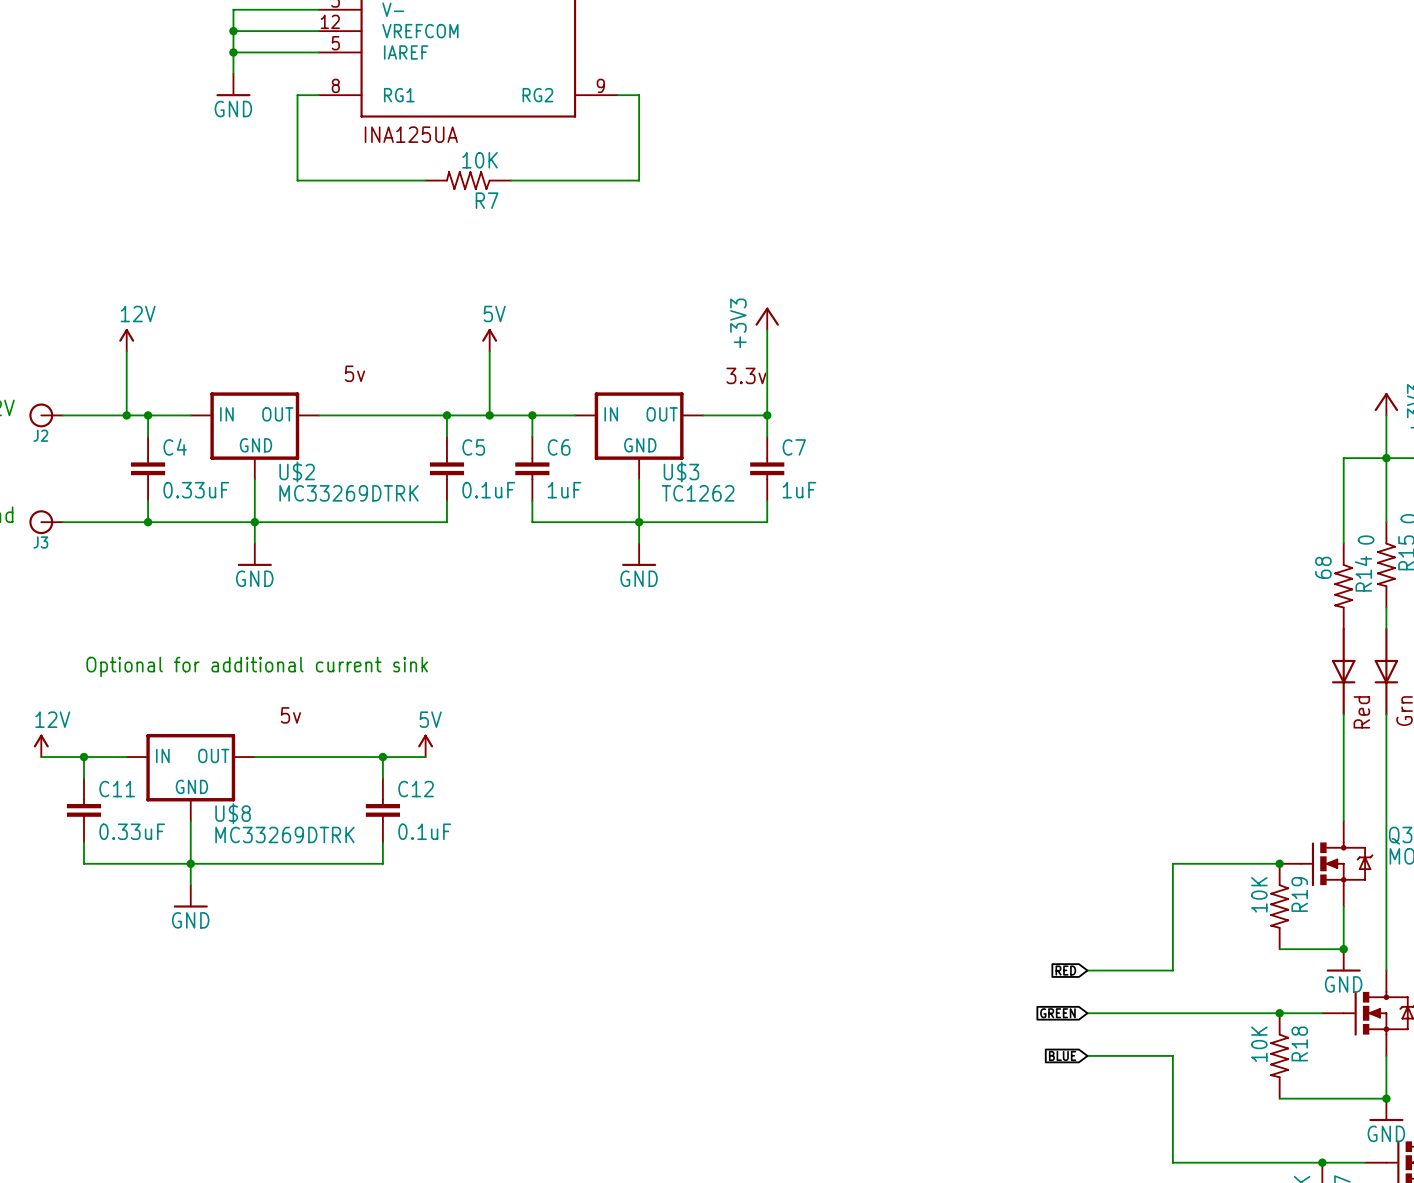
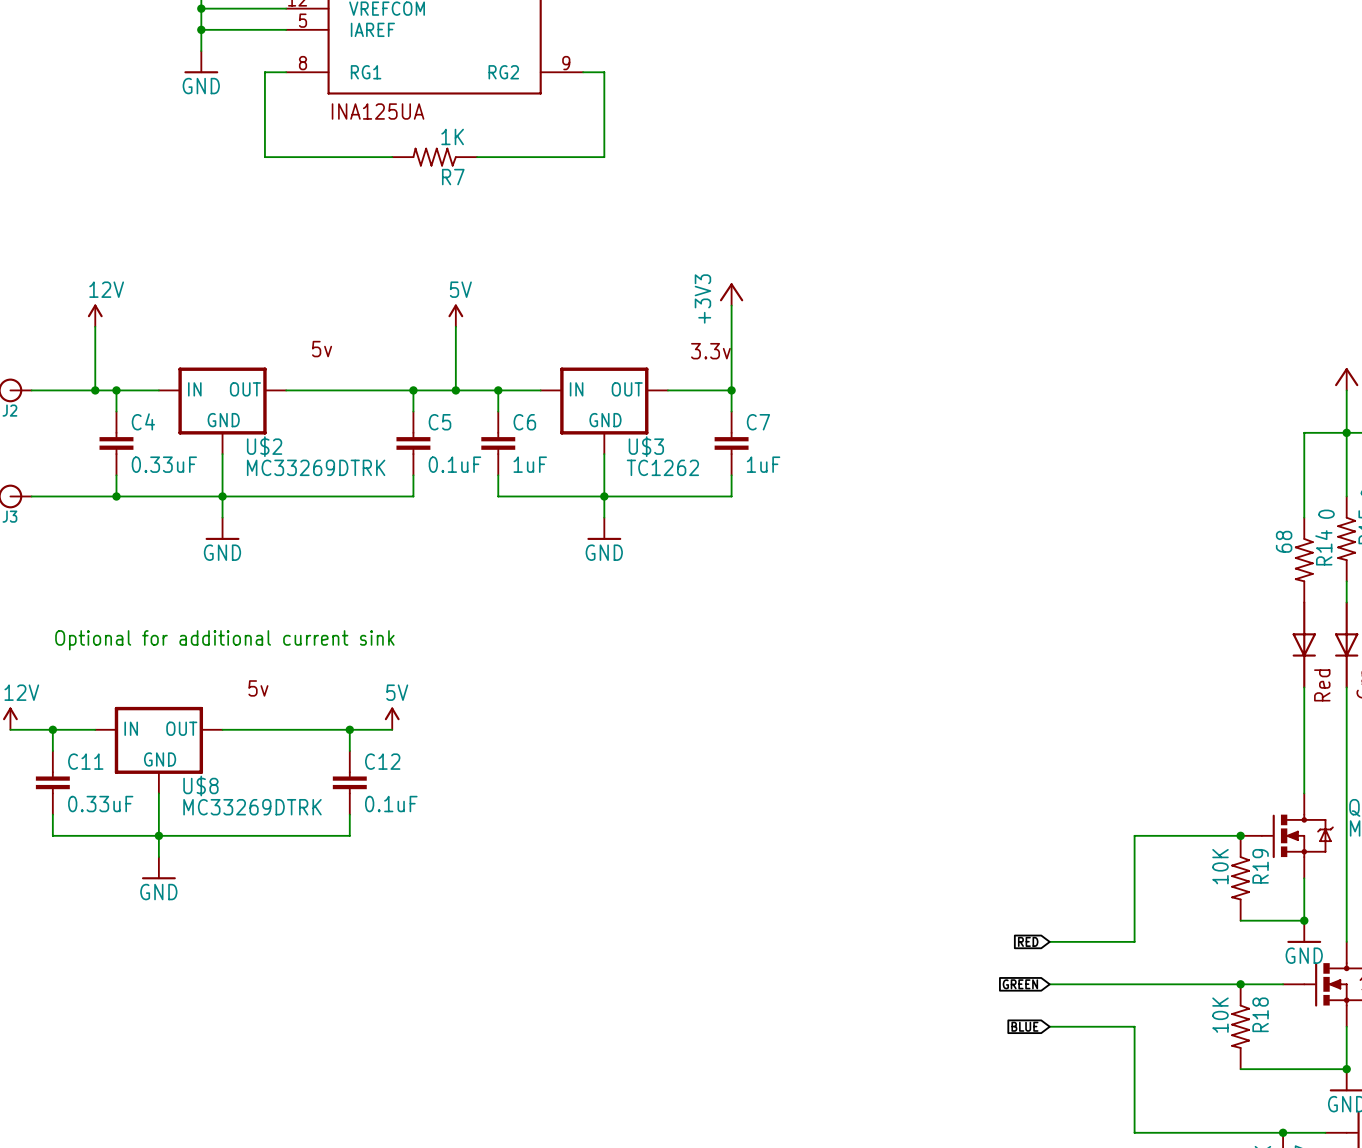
R7 value: 10K (480, 160) -> 1K (452, 136)

